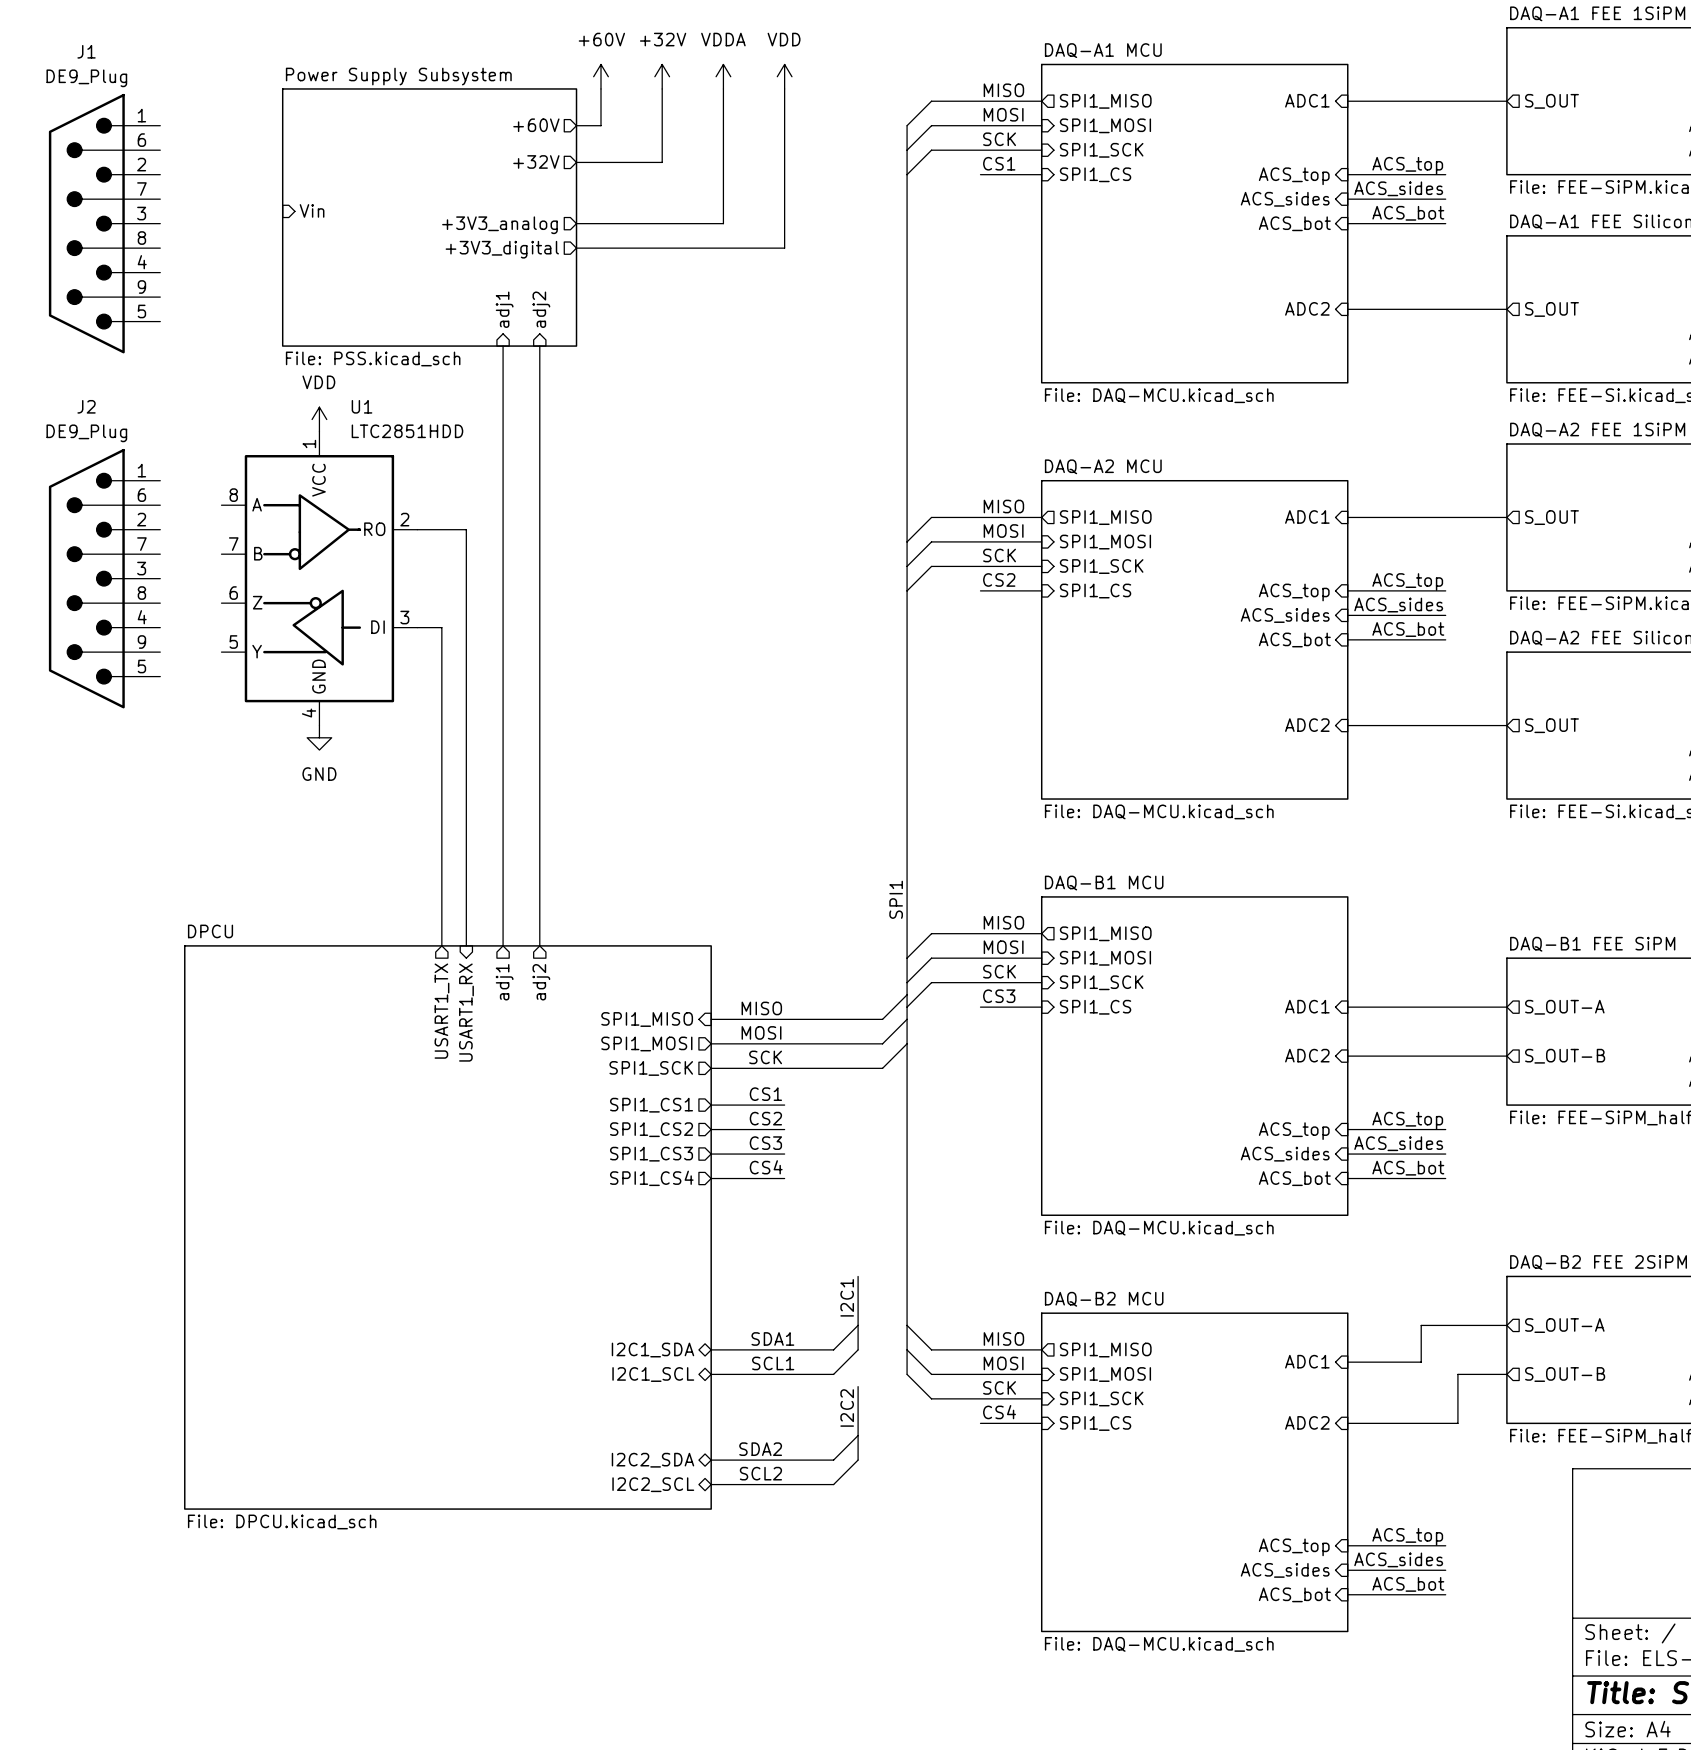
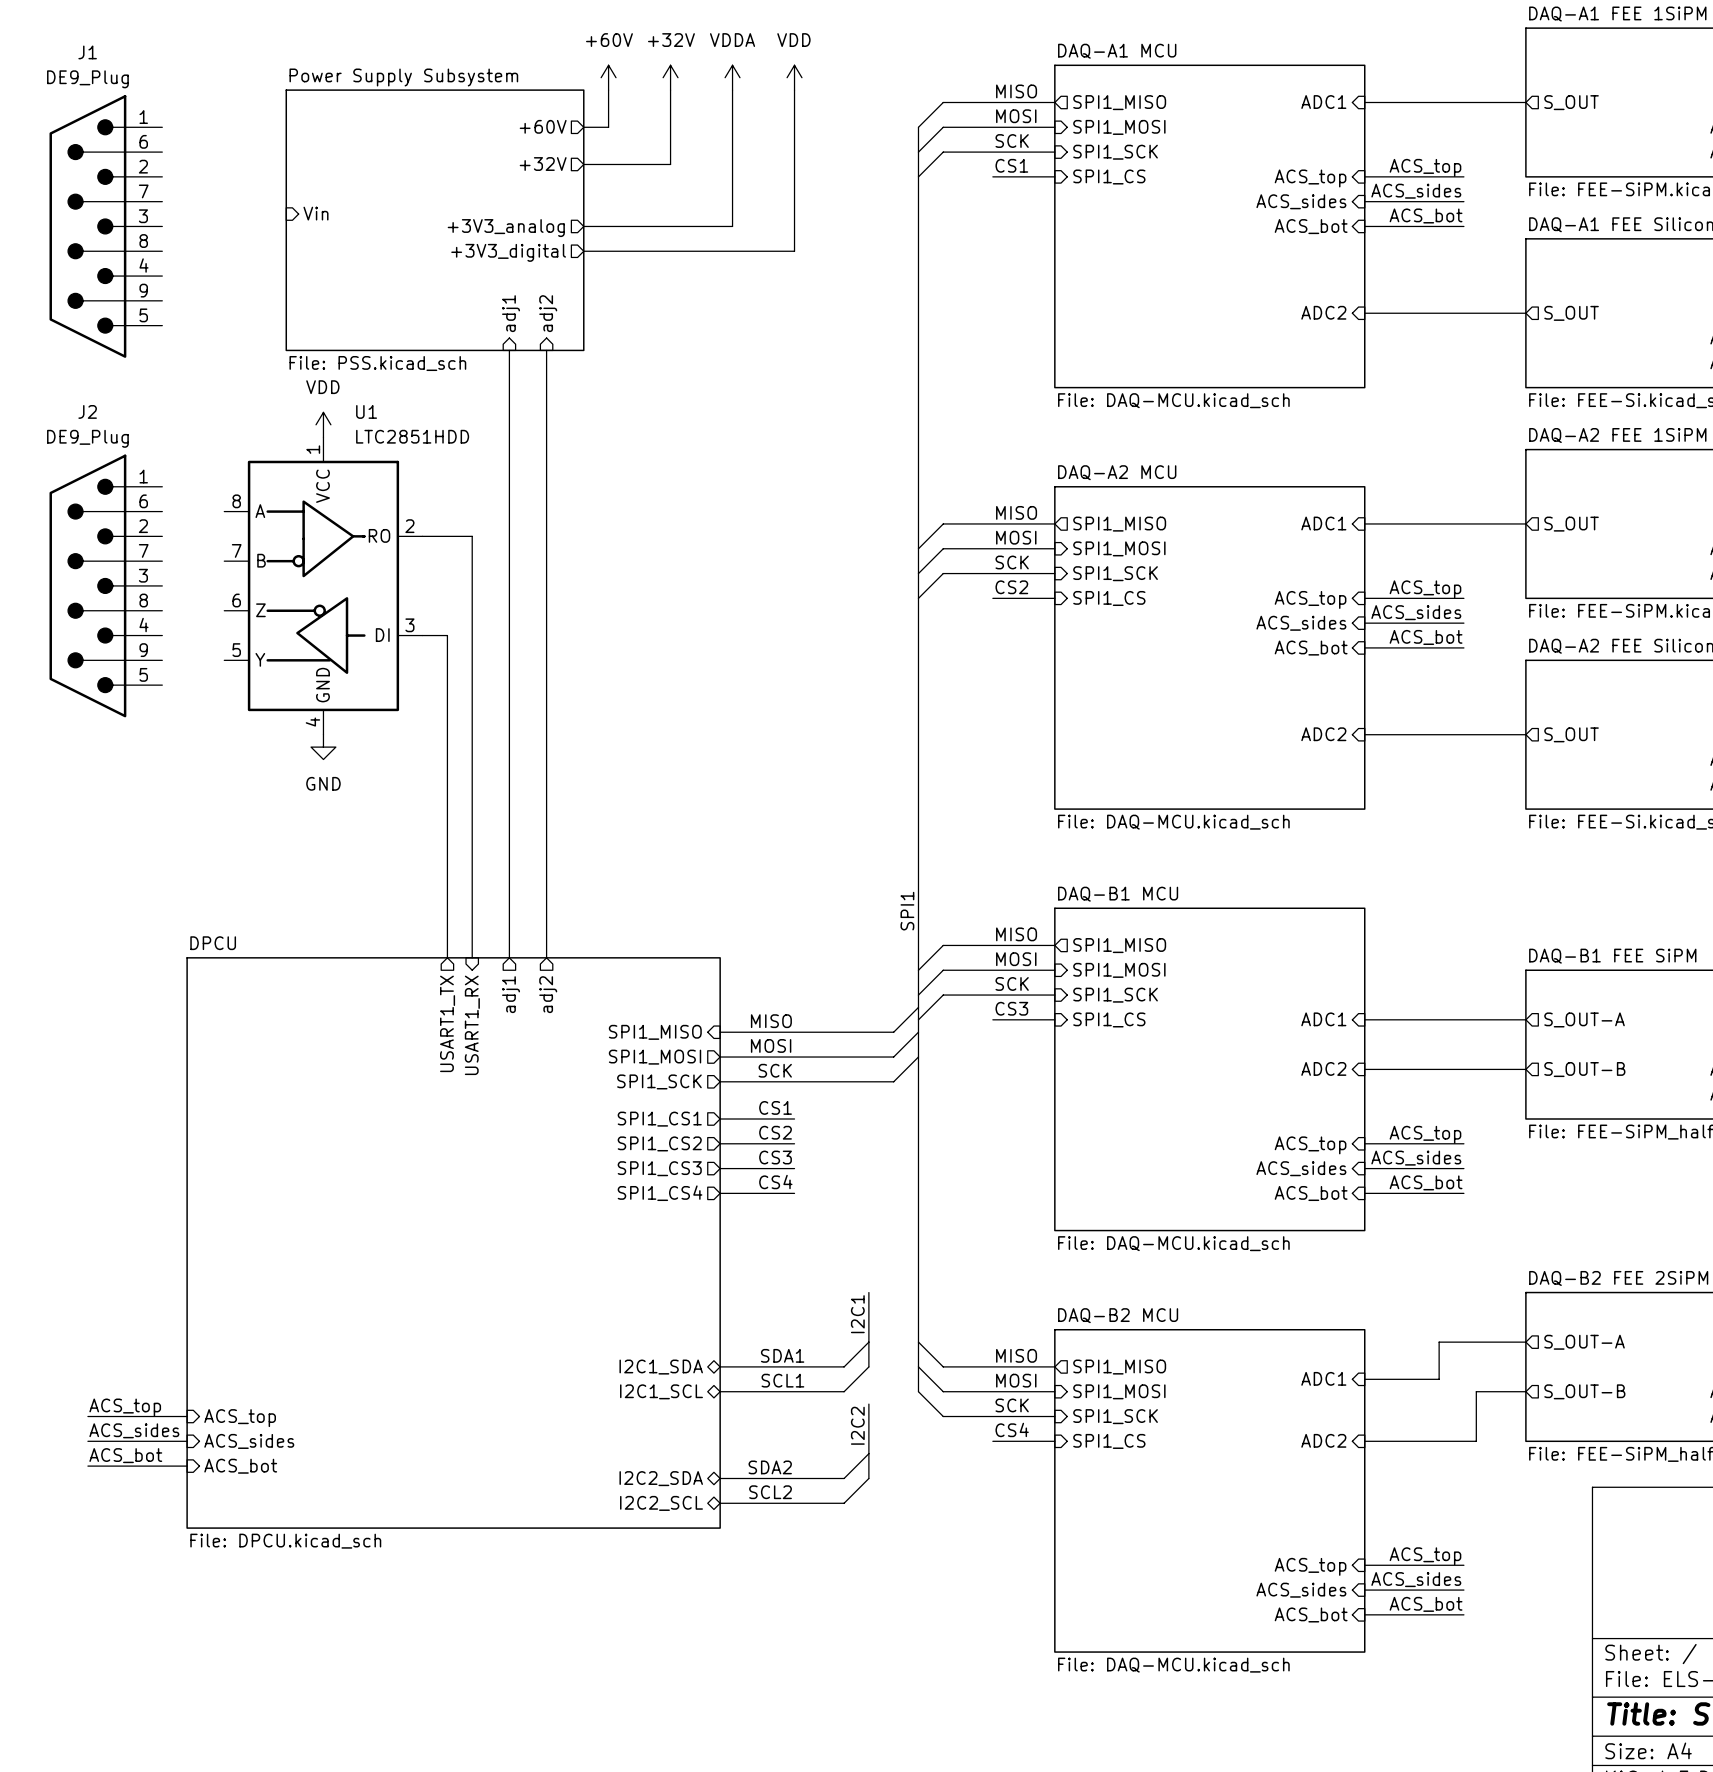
label: none -> ACS_top (125, 1407)
wire: none -> (87, 1416) (187, 1416)
sheet pin: none -> ACS_top (240, 1418)
label: none -> ACS_sides (134, 1430)
wire: none -> (87, 1441) (187, 1441)
sheet pin: none -> ACS_sides (249, 1441)
label: none -> ACS_bot (125, 1455)
wire: none -> (87, 1466) (187, 1466)
sheet pin: none -> ACS_bot (240, 1466)

